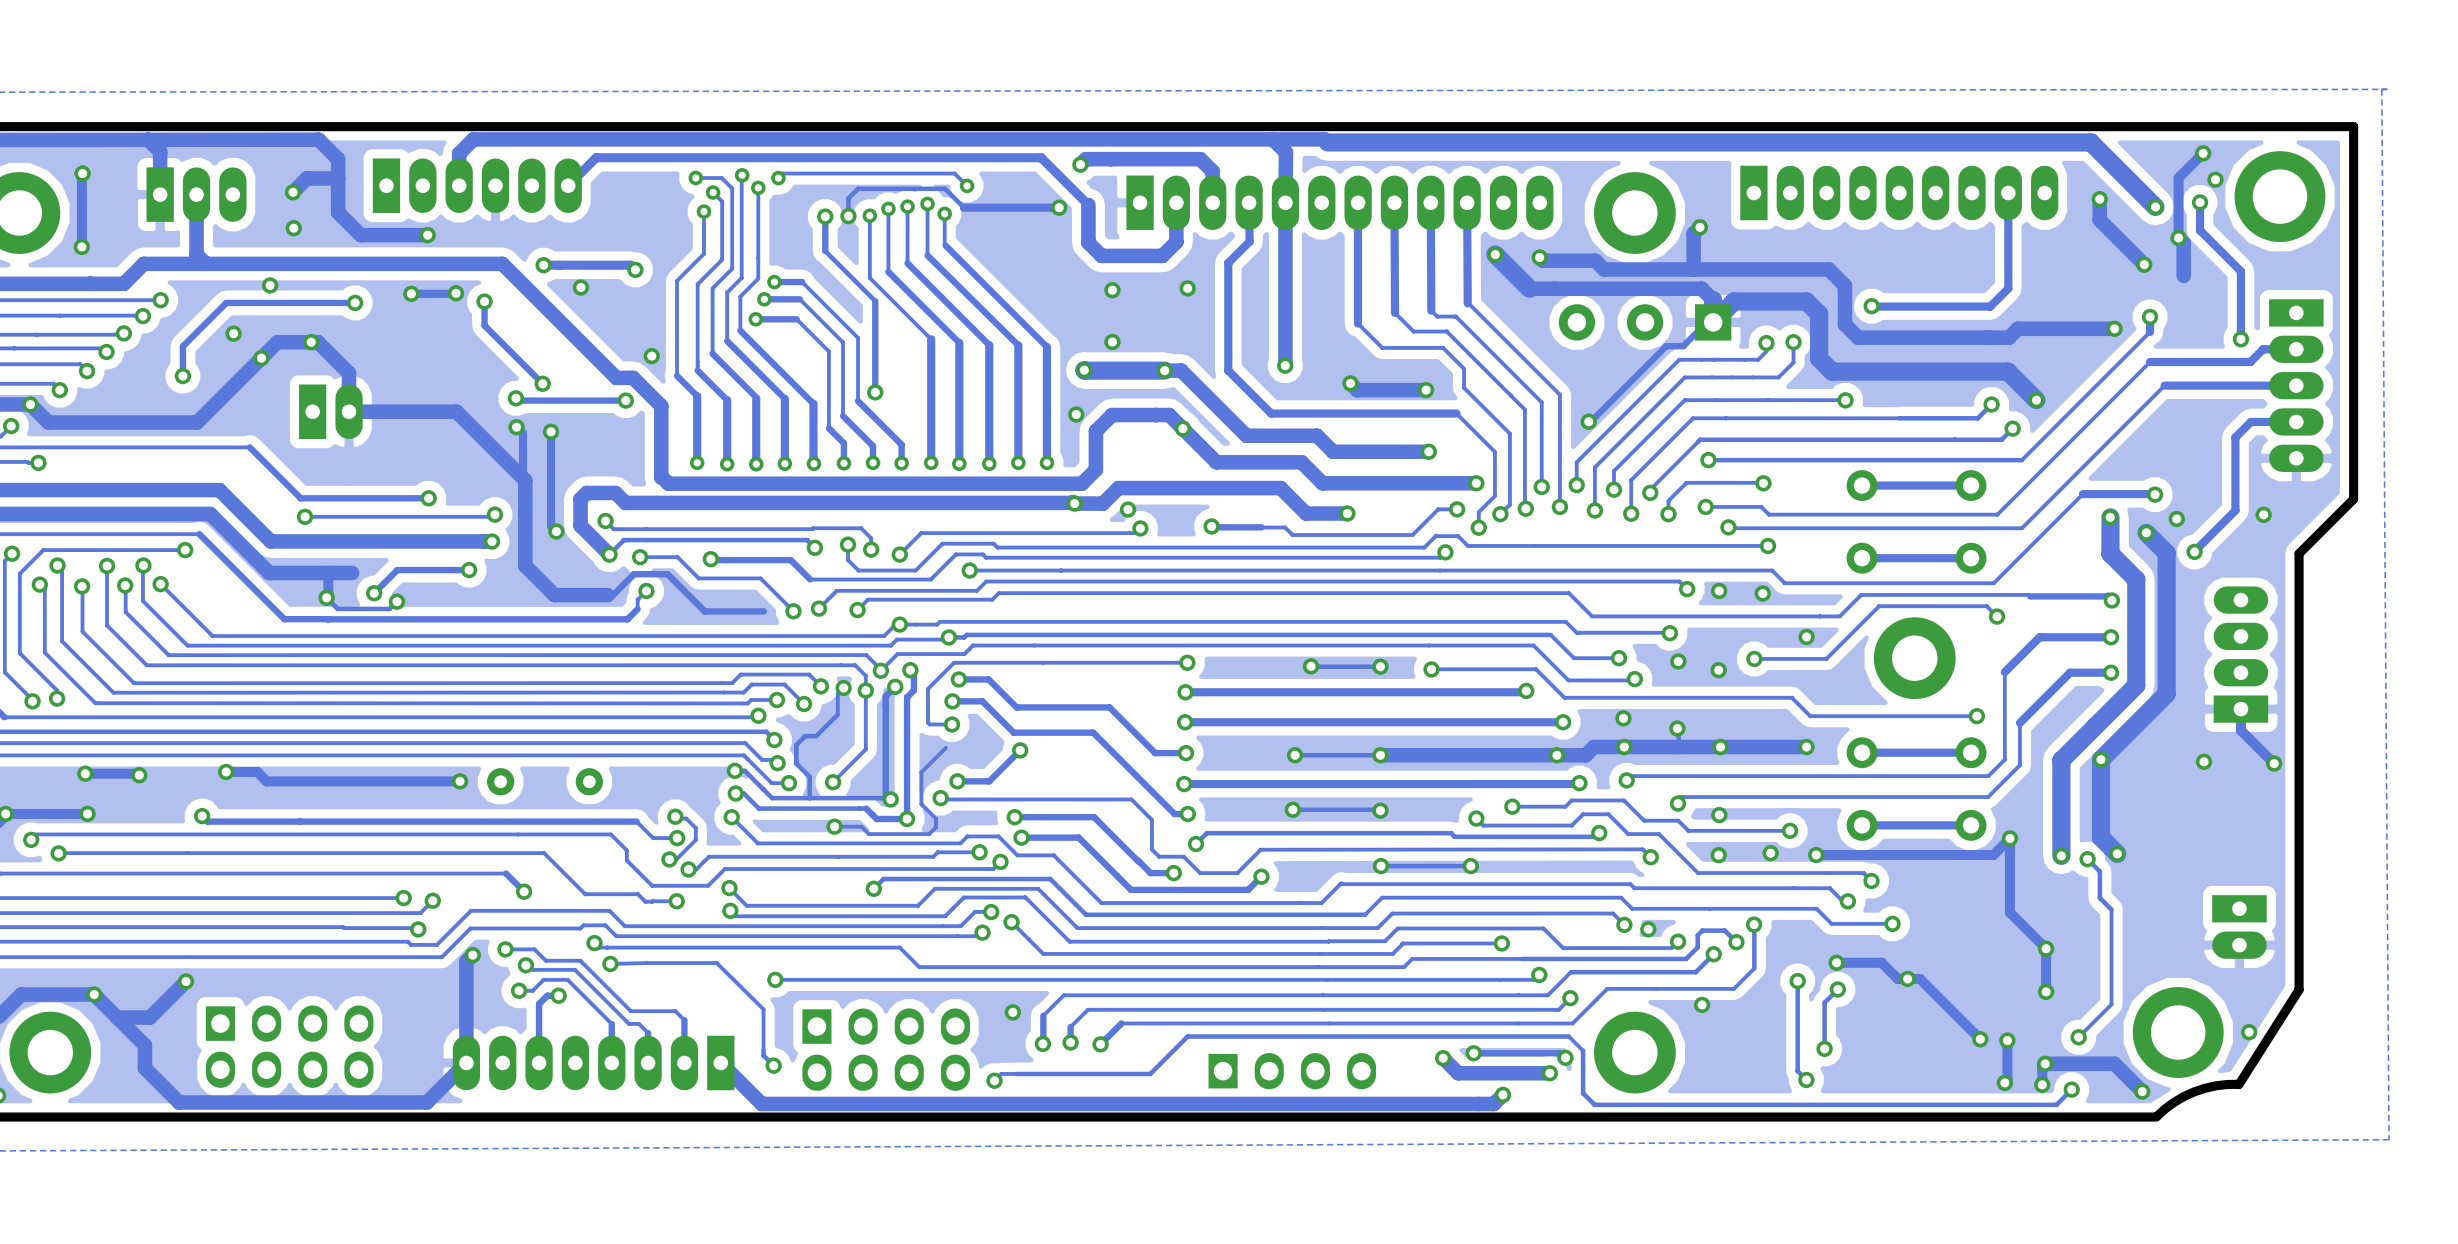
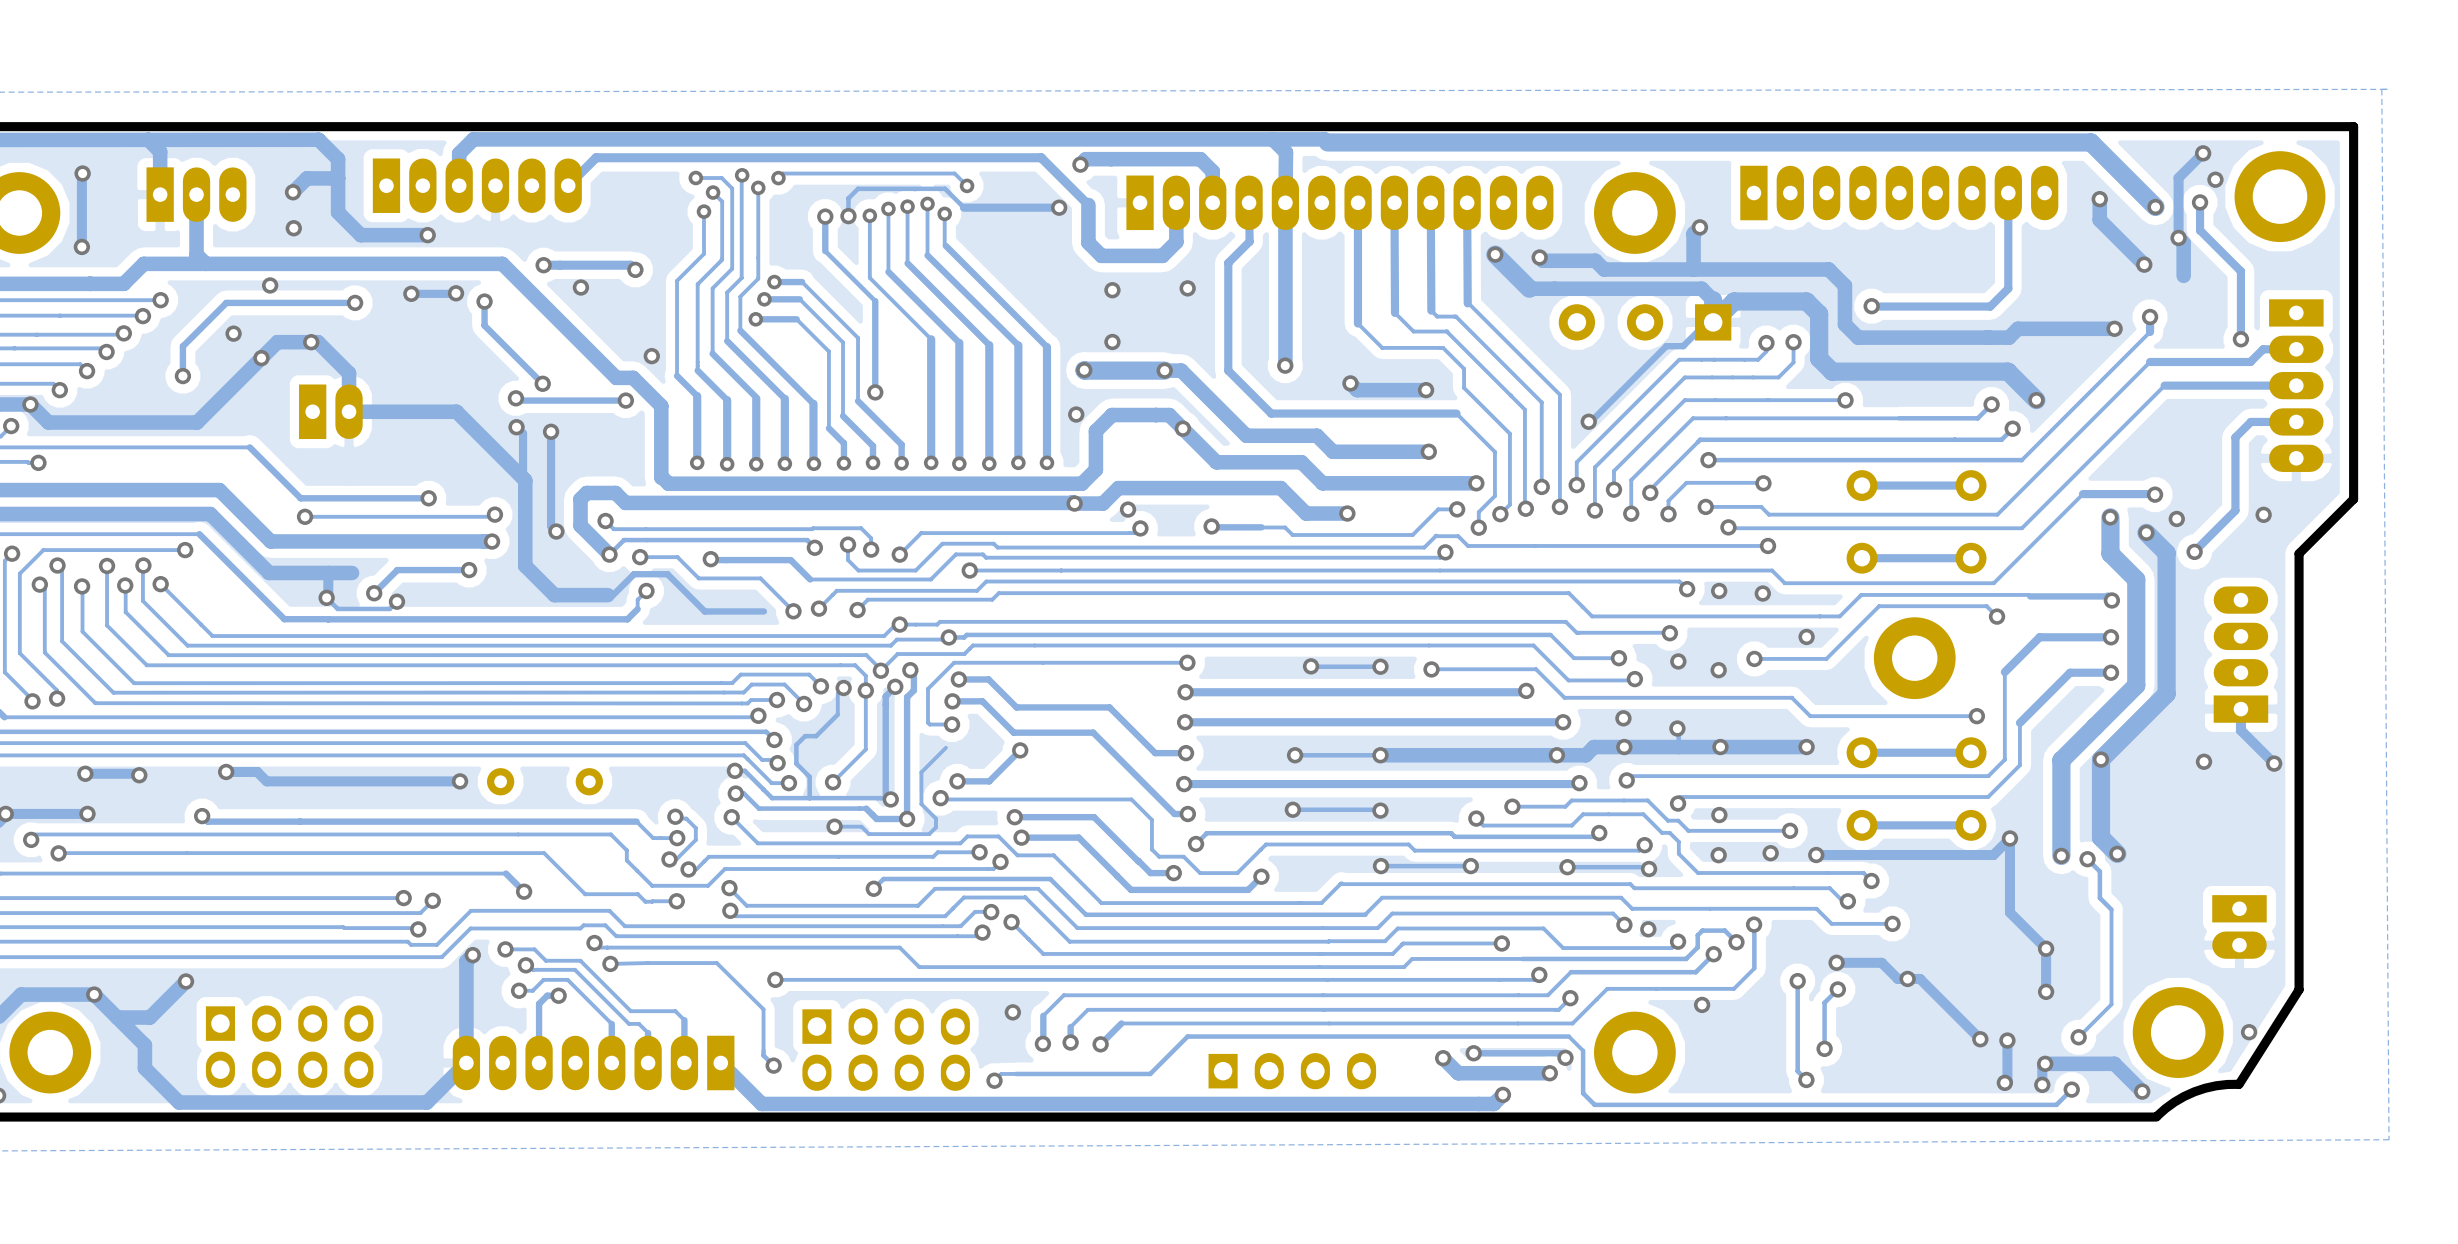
track: (1624, 800) (1644, 820) (1667, 820) -> (1624, 800) (1647, 800) (1667, 820)
track: (1608, 814) (1628, 834) (1659, 834) (1678, 853) -> (1608, 814) (1643, 814) (1661, 832) (1669, 832) (1678, 841) (1678, 853)
via: none -> (1644, 845)
track: (1260, 849) (1642, 849) (1650, 857) -> (1260, 849) (1266, 844) (1408, 844) (1414, 850) (1639, 850) (1644, 845)
via: (1650, 857) -> none
track: none -> (1567, 867) (1647, 867) (1649, 868)
via: none -> (1567, 867)
via: none -> (1649, 868)

